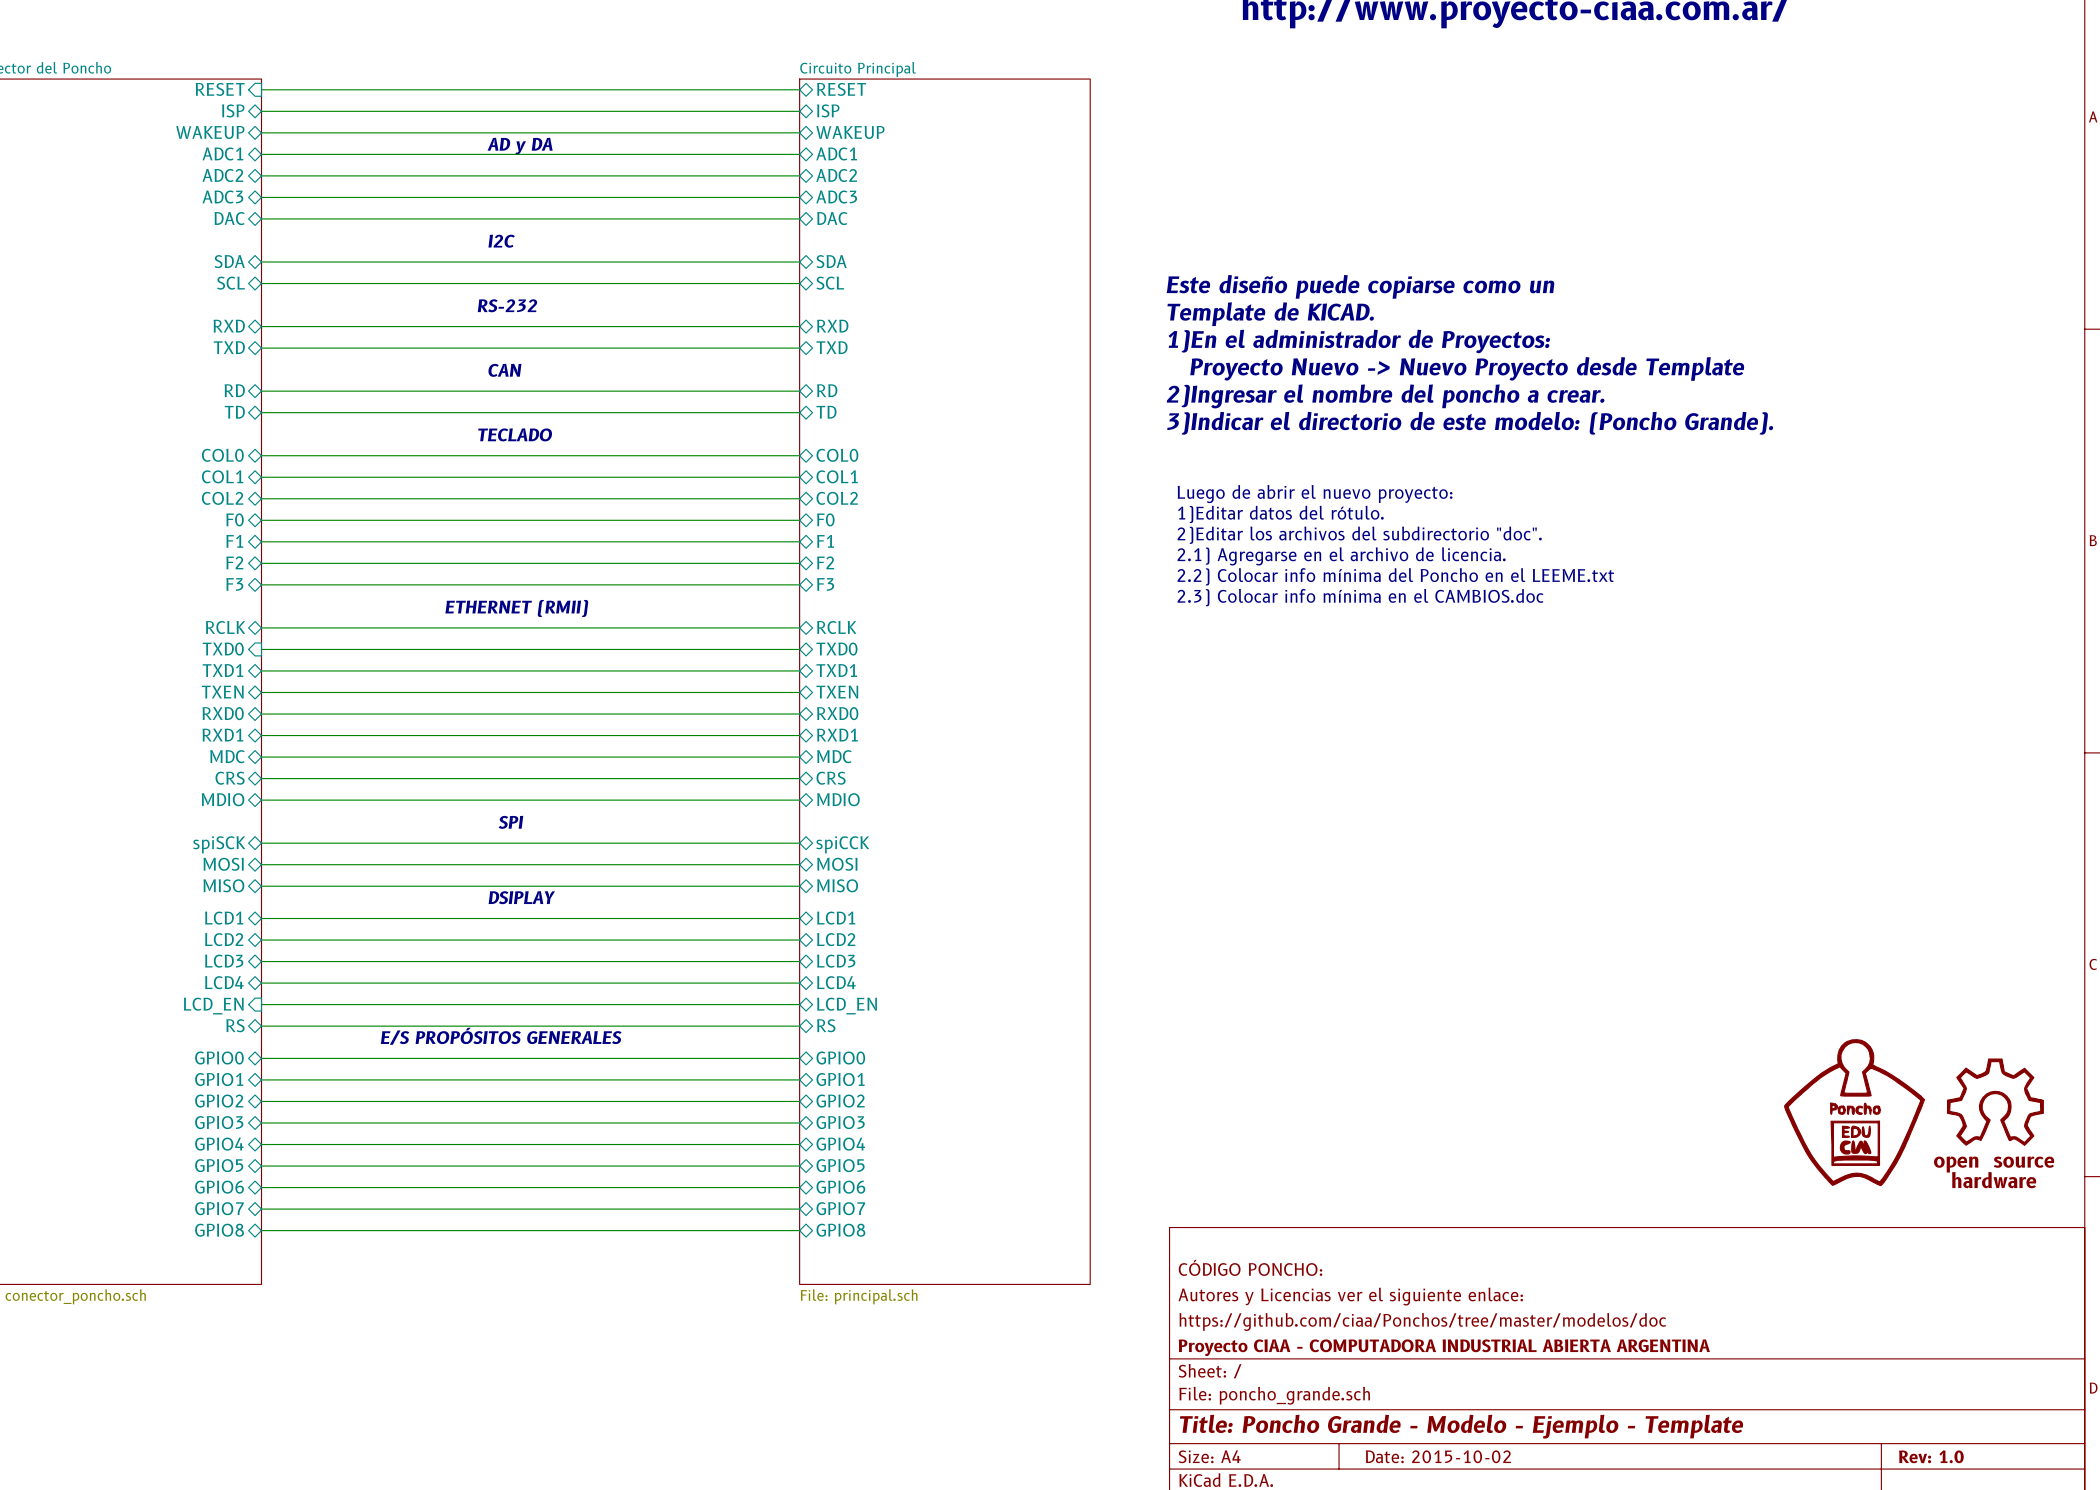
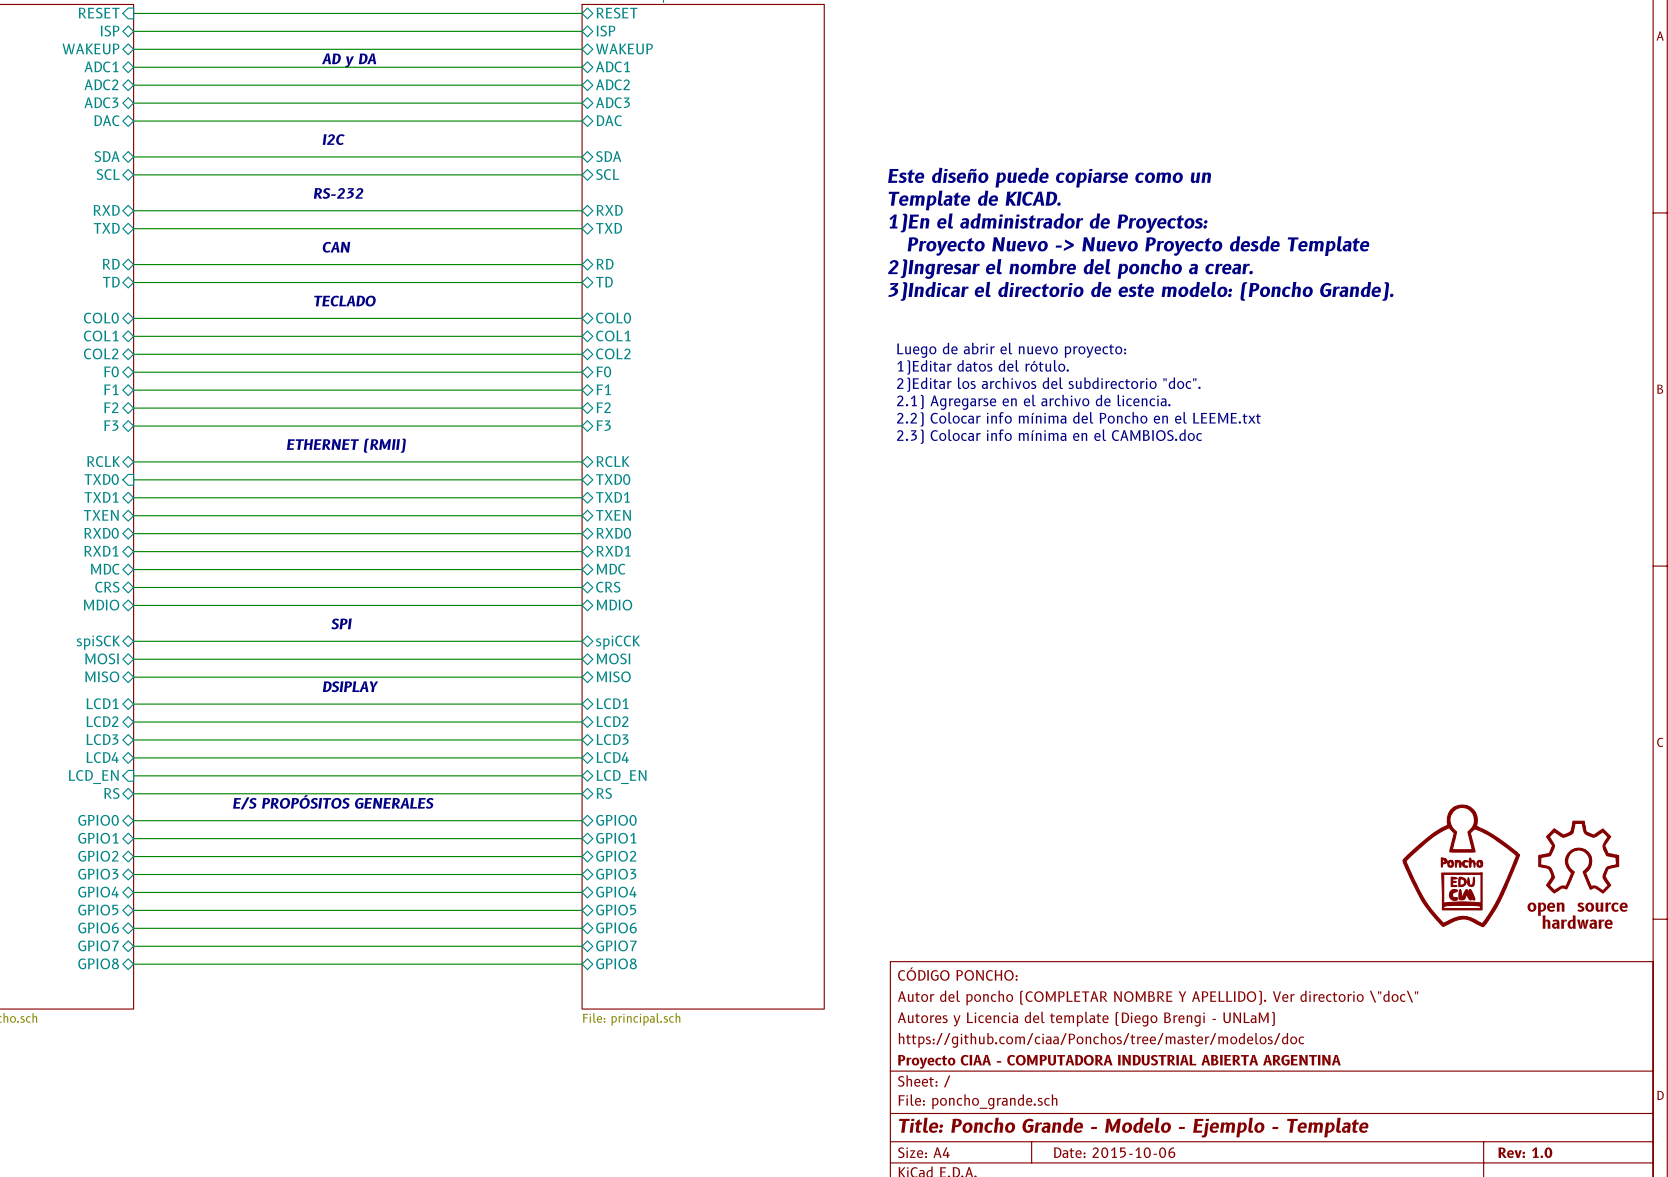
title block: none -> CÓDIGO PONCHO: (957, 974)
title block: CÓDIGO PONCHO: (1250, 1267) -> Autor del poncho (COMPLETAR NOMBRE Y APELLIDO). Ver directorio \"doc\" (1158, 997)
title block: Autores y Licencias ver el siguiente enlace: (1350, 1296) -> Autores y Licencia del template (Diego Brengi - UNLaM) (1086, 1019)
title block: Date: 2015-10-02 (1438, 1456) -> Date: 2015-10-06 (1114, 1152)

